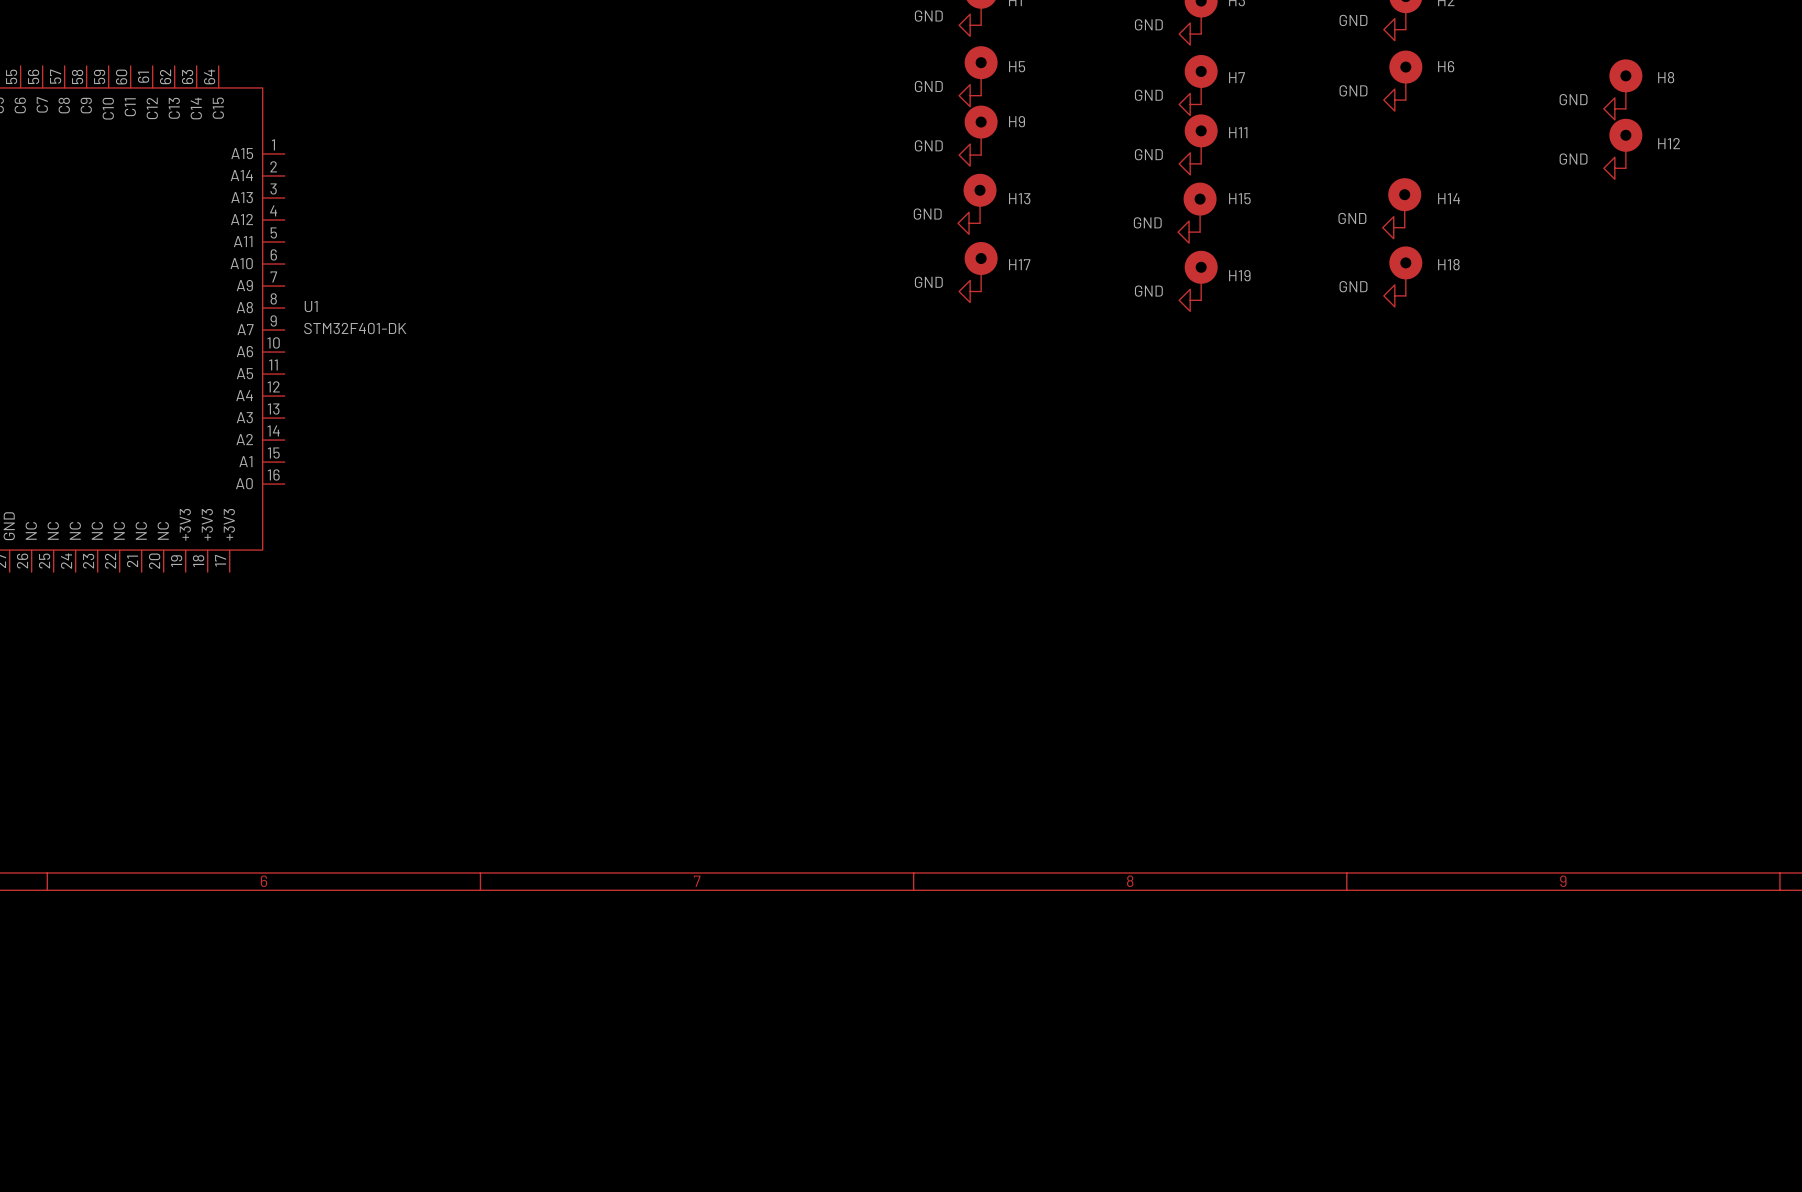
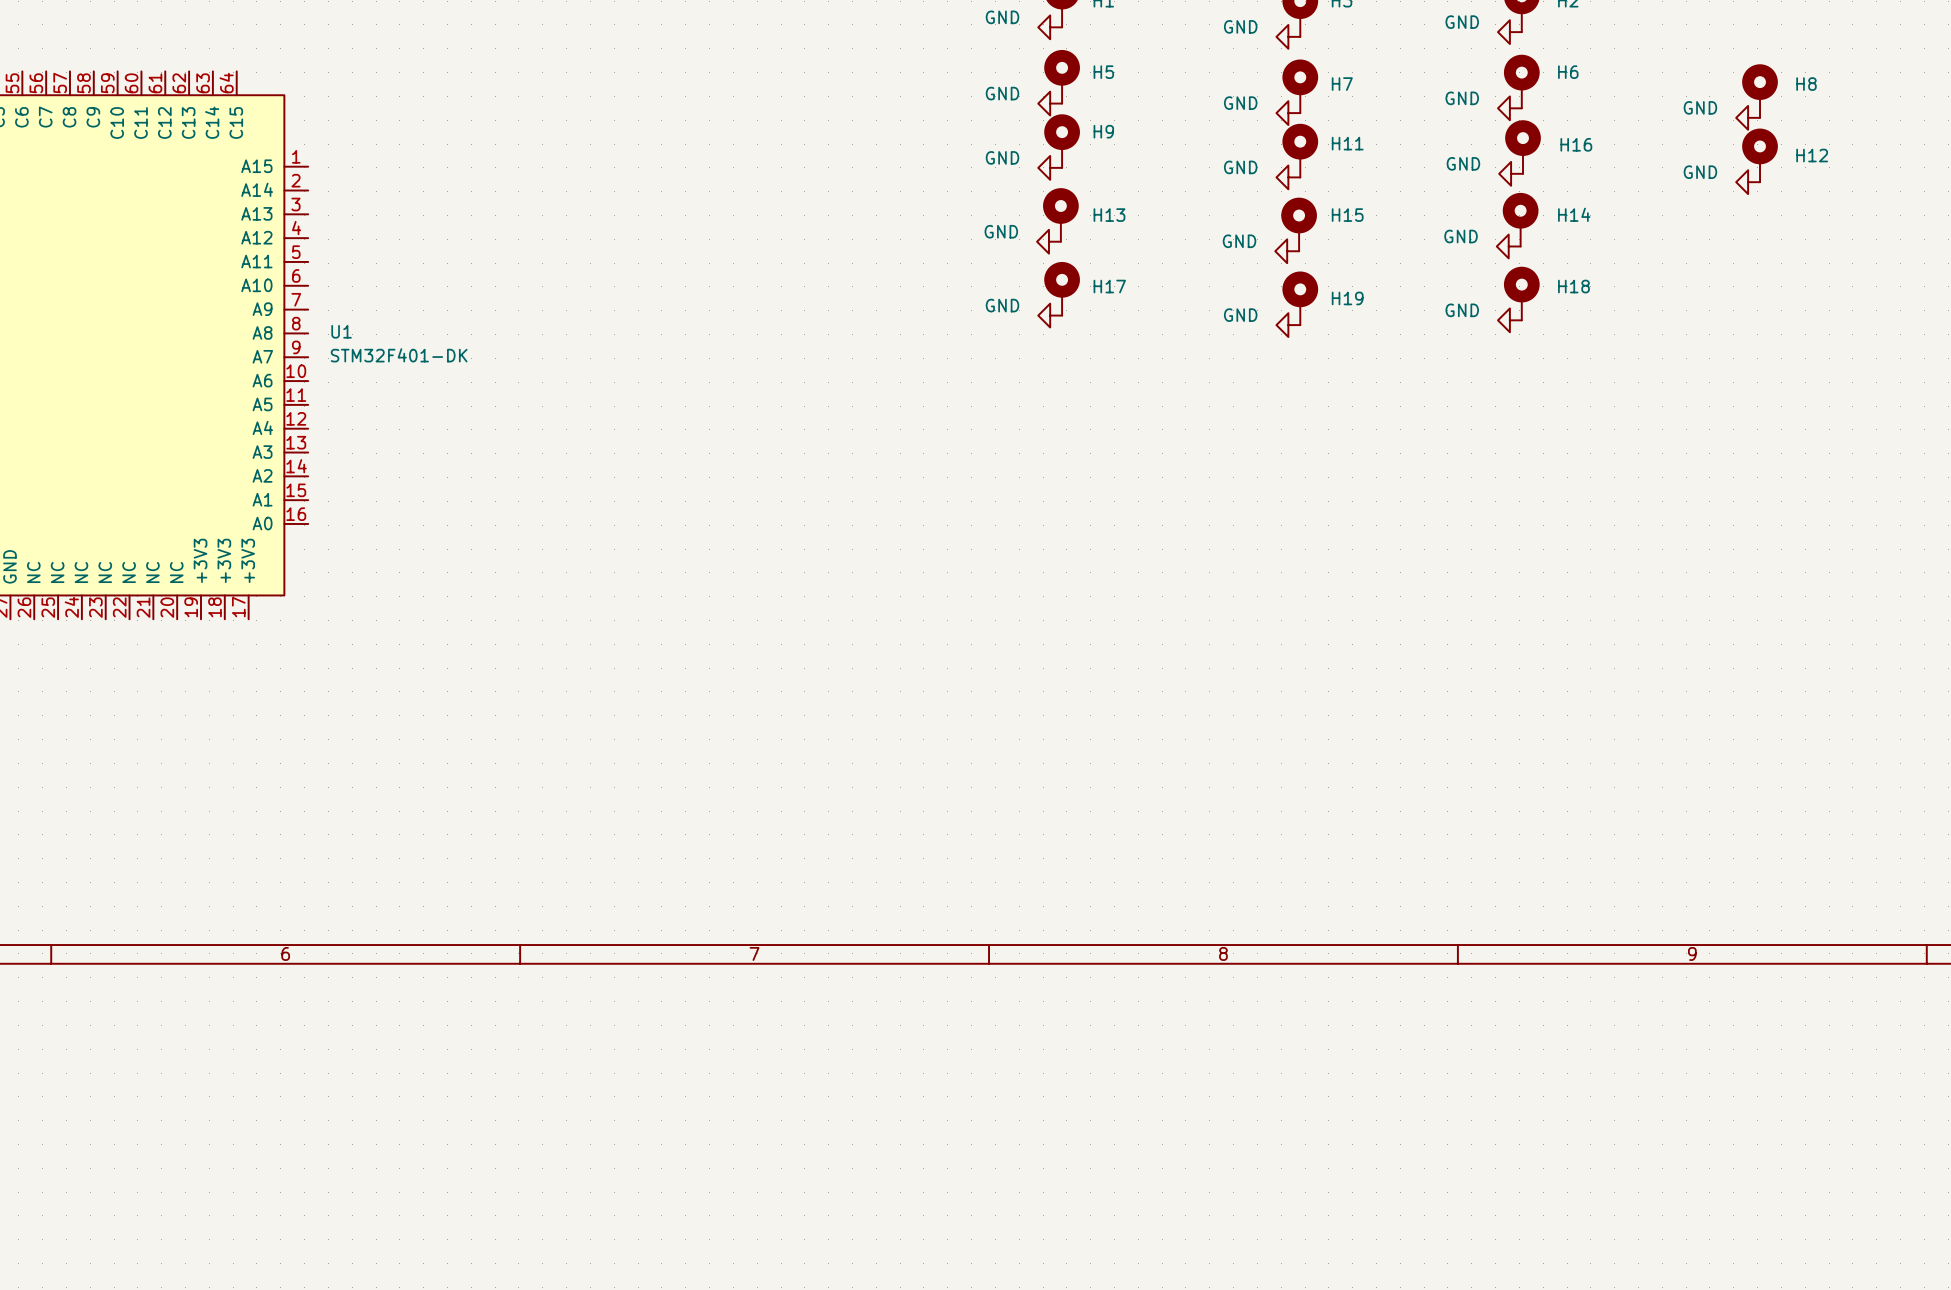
H16: none -> (1523, 147)
power symbol: none -> GND (1511, 173)

